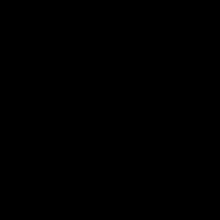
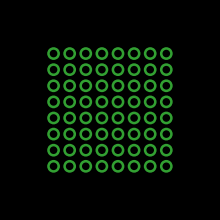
via: none -> (53, 53)
via: none -> (69, 53)
via: none -> (85, 53)
via: none -> (101, 53)
via: none -> (117, 53)
via: none -> (134, 53)
via: none -> (150, 53)
via: none -> (166, 53)
via: none -> (53, 69)
via: none -> (69, 69)
via: none -> (85, 69)
via: none -> (101, 69)
via: none -> (117, 69)
via: none -> (134, 69)
via: none -> (150, 69)
via: none -> (166, 69)
via: none -> (53, 85)
via: none -> (69, 85)
via: none -> (85, 85)
via: none -> (101, 85)
via: none -> (117, 85)
via: none -> (134, 85)
via: none -> (150, 85)
via: none -> (166, 85)
via: none -> (53, 101)
via: none -> (69, 101)
via: none -> (85, 101)
via: none -> (101, 101)
via: none -> (117, 101)
via: none -> (134, 101)
via: none -> (150, 101)
via: none -> (166, 101)
via: none -> (53, 117)
via: none -> (69, 117)
via: none -> (85, 117)
via: none -> (101, 117)
via: none -> (117, 117)
via: none -> (134, 117)
via: none -> (150, 117)
via: none -> (166, 117)
via: none -> (53, 134)
via: none -> (69, 134)
via: none -> (85, 134)
via: none -> (101, 134)
via: none -> (117, 134)
via: none -> (134, 134)
via: none -> (150, 134)
via: none -> (166, 134)
via: none -> (53, 150)
via: none -> (69, 150)
via: none -> (85, 150)
via: none -> (101, 150)
via: none -> (117, 150)
via: none -> (134, 150)
via: none -> (150, 150)
via: none -> (166, 150)
via: none -> (53, 166)
via: none -> (69, 166)
via: none -> (85, 166)
via: none -> (101, 166)
via: none -> (117, 166)
via: none -> (134, 166)
via: none -> (150, 166)
via: none -> (166, 166)

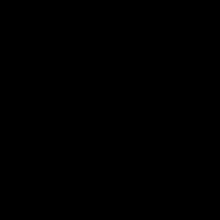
via: (53, 53) -> none
via: (69, 53) -> none
via: (85, 53) -> none
via: (101, 53) -> none
via: (117, 53) -> none
via: (134, 53) -> none
via: (150, 53) -> none
via: (166, 53) -> none
via: (53, 69) -> none
via: (69, 69) -> none
via: (85, 69) -> none
via: (101, 69) -> none
via: (117, 69) -> none
via: (134, 69) -> none
via: (150, 69) -> none
via: (166, 69) -> none
via: (53, 85) -> none
via: (69, 85) -> none
via: (85, 85) -> none
via: (101, 85) -> none
via: (117, 85) -> none
via: (134, 85) -> none
via: (150, 85) -> none
via: (166, 85) -> none
via: (53, 101) -> none
via: (69, 101) -> none
via: (85, 101) -> none
via: (101, 101) -> none
via: (117, 101) -> none
via: (134, 101) -> none
via: (150, 101) -> none
via: (166, 101) -> none
via: (53, 117) -> none
via: (69, 117) -> none
via: (85, 117) -> none
via: (101, 117) -> none
via: (117, 117) -> none
via: (134, 117) -> none
via: (150, 117) -> none
via: (166, 117) -> none
via: (53, 134) -> none
via: (69, 134) -> none
via: (85, 134) -> none
via: (101, 134) -> none
via: (117, 134) -> none
via: (134, 134) -> none
via: (150, 134) -> none
via: (166, 134) -> none
via: (53, 150) -> none
via: (69, 150) -> none
via: (85, 150) -> none
via: (101, 150) -> none
via: (117, 150) -> none
via: (134, 150) -> none
via: (150, 150) -> none
via: (166, 150) -> none
via: (53, 166) -> none
via: (69, 166) -> none
via: (85, 166) -> none
via: (101, 166) -> none
via: (117, 166) -> none
via: (134, 166) -> none
via: (150, 166) -> none
via: (166, 166) -> none

